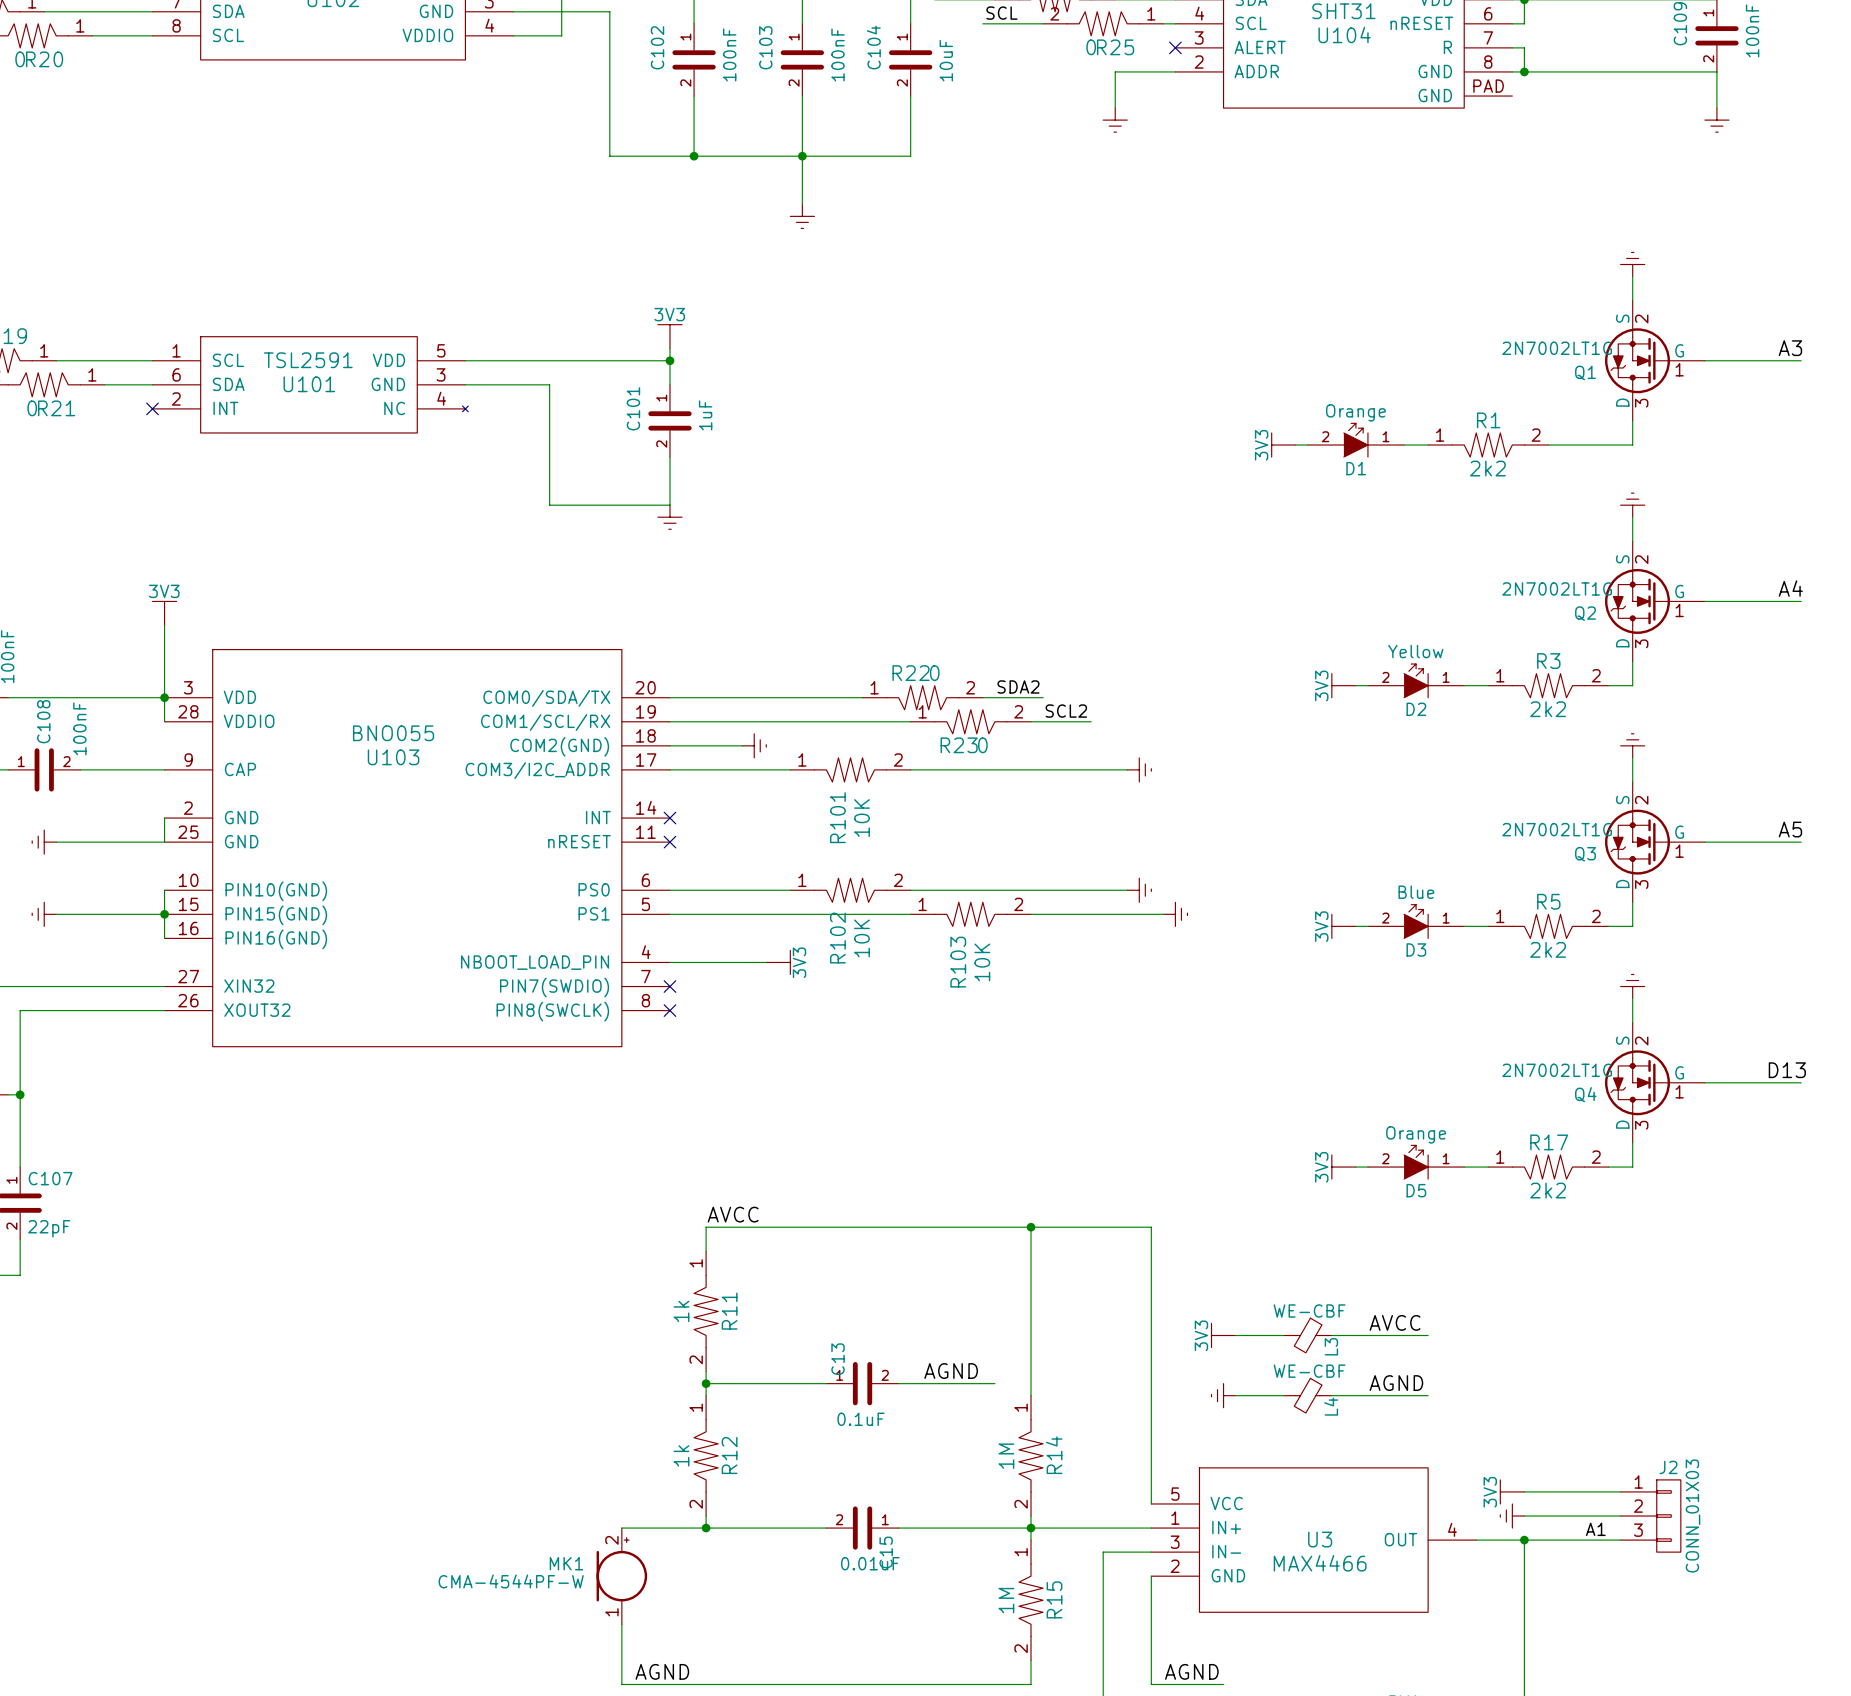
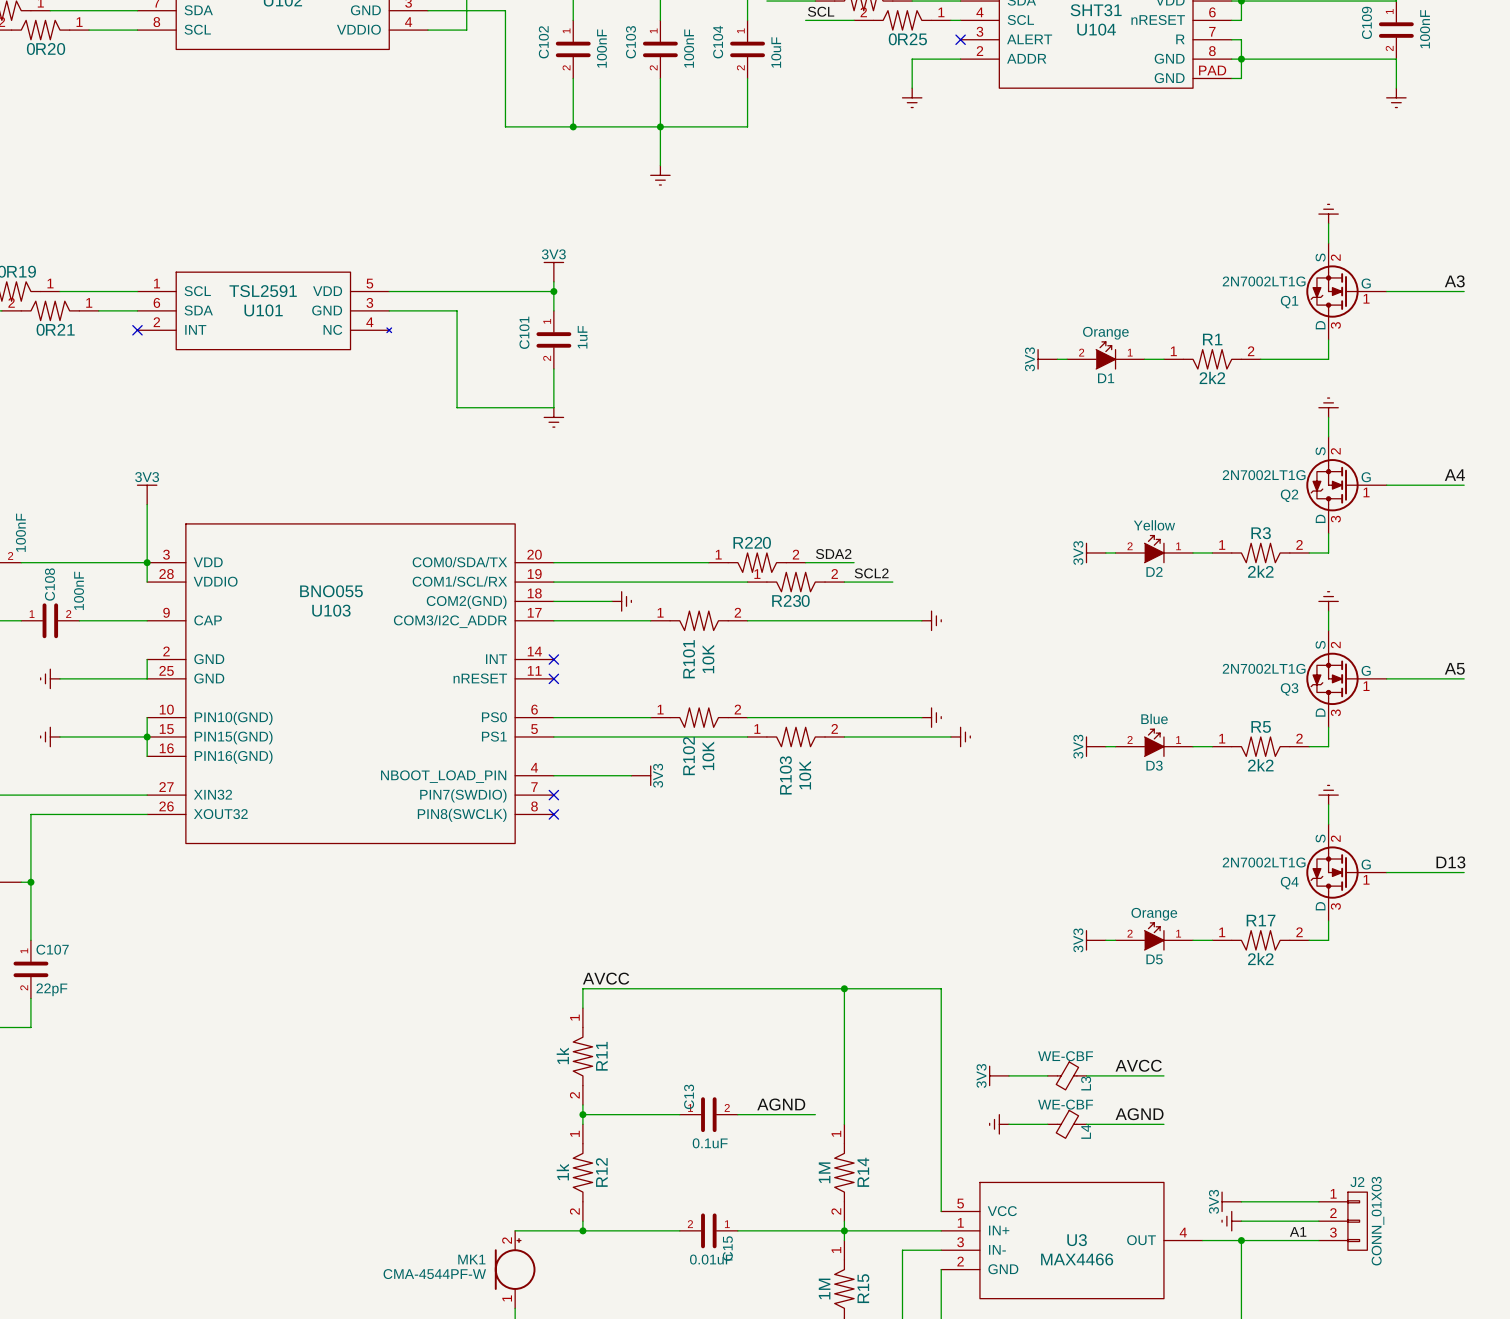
wire: none -> (1241, 59) (1241, 78) (1231, 78)

